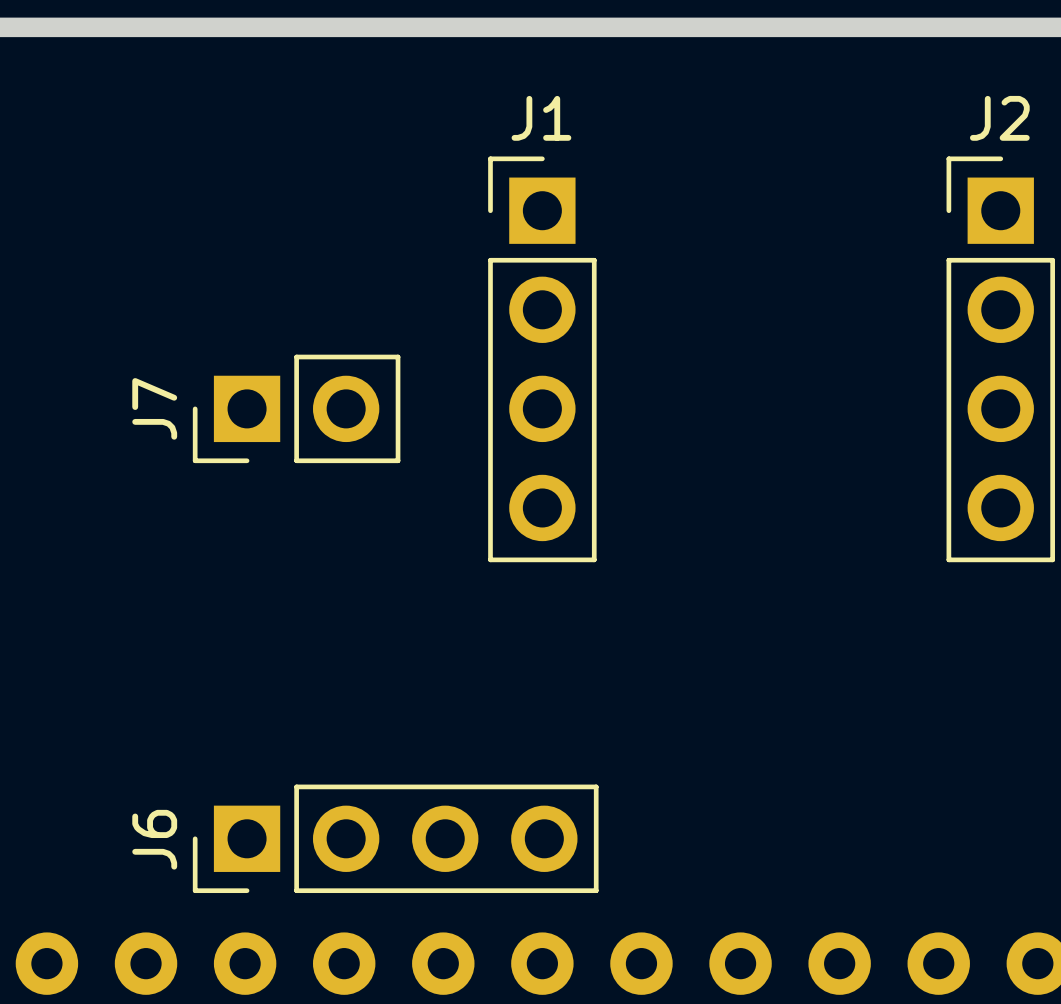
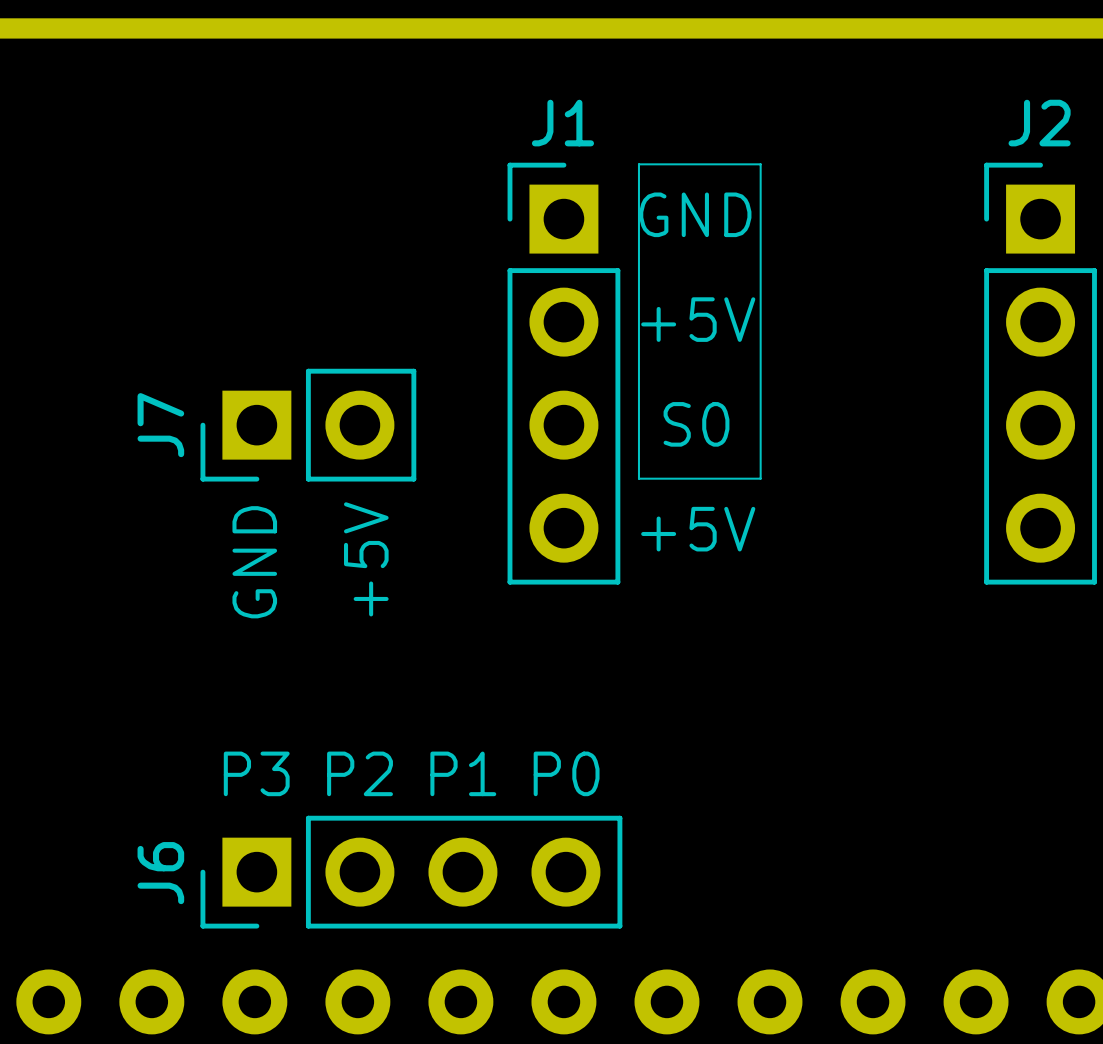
line: none -> (638, 164) (760, 164) (760, 478) (638, 478) (638, 164)
text: none -> GND (695, 214)
text: none -> +5V (698, 319)
text: none -> S0 (696, 424)
text: none -> +5V (698, 529)
text: none -> +5V (366, 559)
text: none -> GND (254, 562)
text: none -> P3 (256, 773)
text: none -> P2 (360, 773)
text: none -> P1 (463, 773)
text: none -> P0 (566, 773)

